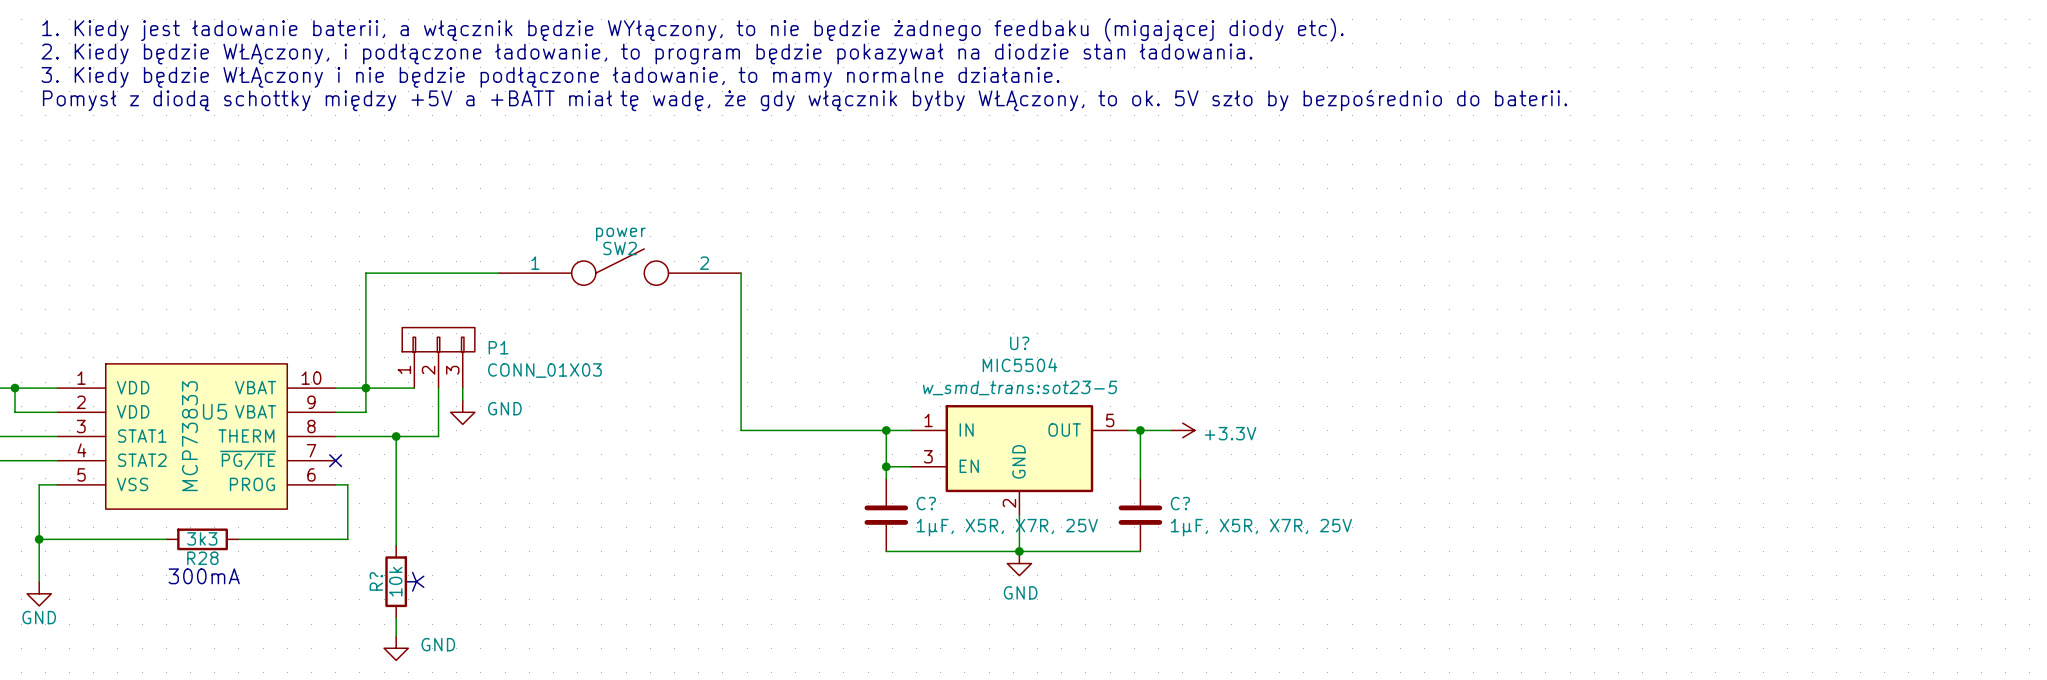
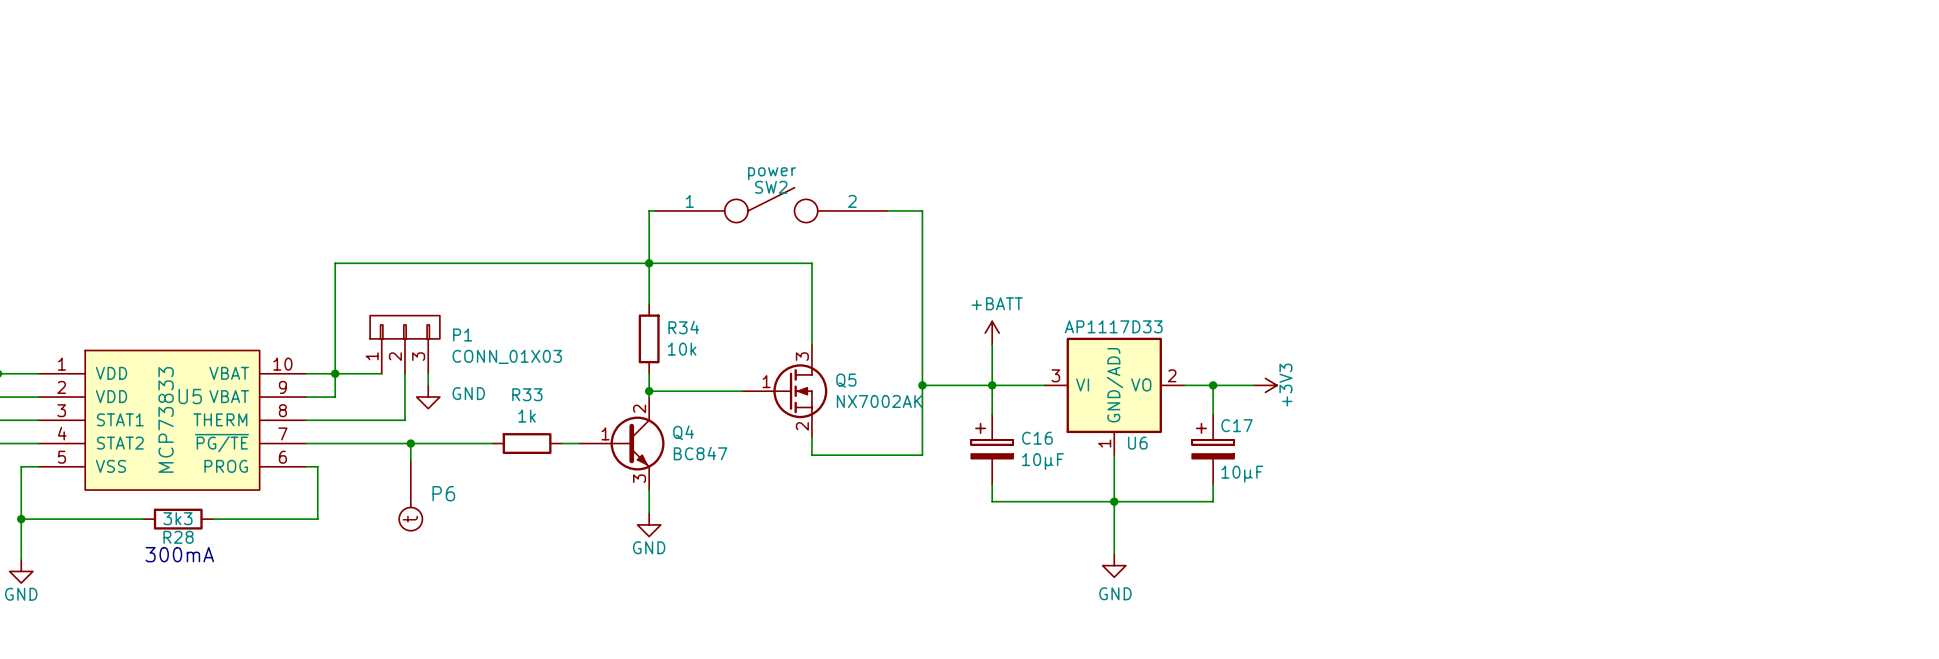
text: 1. Kiedy jest ładowanie baterii, a włącznik będzie WYłączony, to nie będzie żadnego feedbaku (migającej diody etc). (692, 29) -> none
text: 2. Kiedy będzie WŁĄczony, i podłączone ładowanie, to program będzie pokazywał na diodzie stan ładowania. (646, 54) -> none
text: 3. Kiedy będzie WŁĄczony i nie będzie podłączone ładowanie, to mamy normalne działanie. (550, 77) -> none
text: Pomysł z diodą schottky między +5V a +BATT miał tę wadę, że gdy włącznik byłby WŁĄczony, to ok. 5V szło by bezpośrednio do baterii. (805, 100) -> none
wire: none -> (654, 210) (649, 210) (649, 304)
wire: none -> (887, 210) (922, 210) (922, 455) (811, 455) (811, 437)
SW2 position: (620, 267) -> (771, 205)
wire: none -> (463, 263) (811, 263) (811, 344)
junction: none -> (649, 263)
wire: (741, 273) (741, 430) (910, 430) -> none
power symbol: none -> +BATT (992, 333)
R34: none -> 10k (649, 338)
wire: none -> (992, 344) (992, 414)
wire: none -> (649, 373) (649, 397)
wire: none -> (922, 385) (1044, 385)
junction: none -> (922, 385)
junction: none -> (992, 385)
wire: none -> (1184, 385) (1253, 385)
wire: none -> (1213, 385) (1213, 414)
junction: none -> (1213, 385)
power symbol: none -> +3V3 (1265, 385)
wire: none -> (649, 391) (742, 391)
junction: none -> (649, 391)
Q5: none -> NX7002AK (784, 391)
U6: none -> AP1117D33 (1114, 396)
wire: (886, 430) (886, 478) -> none
junction: (886, 430) -> none
wire: (1140, 430) (1140, 478) -> none
junction: (1140, 430) -> none
power symbol: +3.3V (1182, 430) -> none
wire: (396, 436) (396, 545) -> none
junction position: (396, 436) -> (410, 443)
wire: none -> (306, 443) (492, 443)
no-connect mark: (335, 460) -> none
R33: none -> 1k (527, 443)
wire: none -> (561, 443) (579, 443)
Q4: none -> BC847 (621, 443)
U?: MIC5504 (1019, 460) -> none
wire: (886, 466) (910, 466) -> none
junction: (886, 466) -> none
C16: none -> 10µF (992, 449)
C17: none -> 10µF (1213, 449)
wire: none -> (1114, 455) (1114, 554)
wire: none -> (992, 484) (992, 501) (1213, 501) (1213, 484)
wire: none -> (649, 490) (649, 513)
P6: none -> (410, 495)
C?: 1µF, X5R, X7R, 25V (886, 515) -> none
wire: (1019, 515) (1019, 551) -> none
C?: 1µF, X5R, X7R, 25V (1140, 515) -> none
junction: none -> (1114, 501)
power symbol: none -> GND (649, 524)
wire: (886, 551) (1140, 551) -> none
junction: (1019, 551) -> none
power symbol position: GND (1019, 563) -> GND (1114, 565)
R?: 10k (396, 581) -> none
text: * (415, 581) -> none
wire: (396, 618) (396, 636) -> (410, 443) (410, 460)
power symbol: GND (396, 648) -> none

